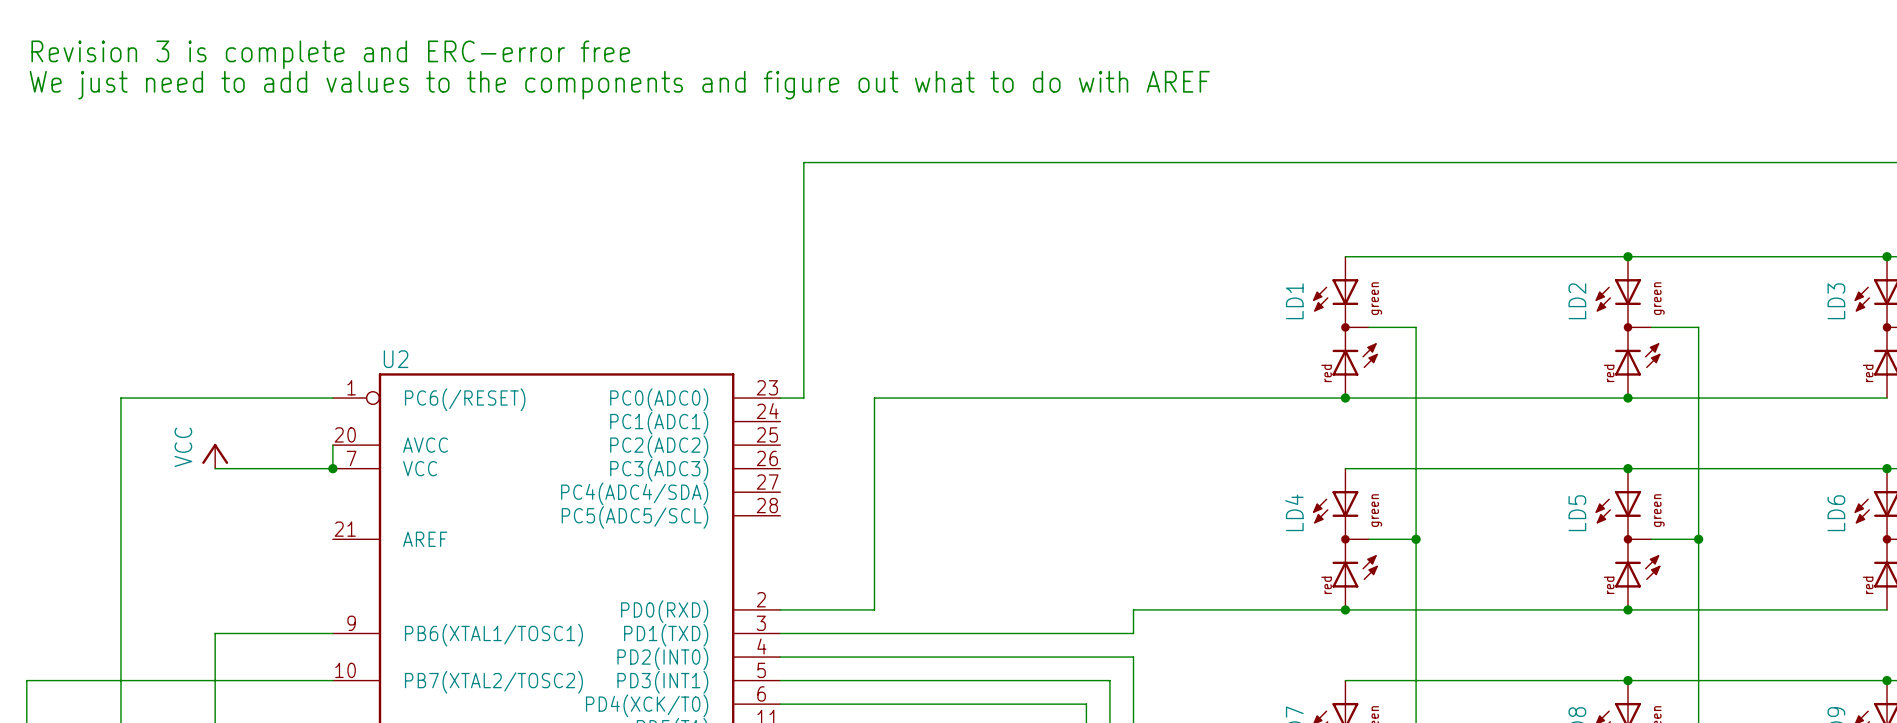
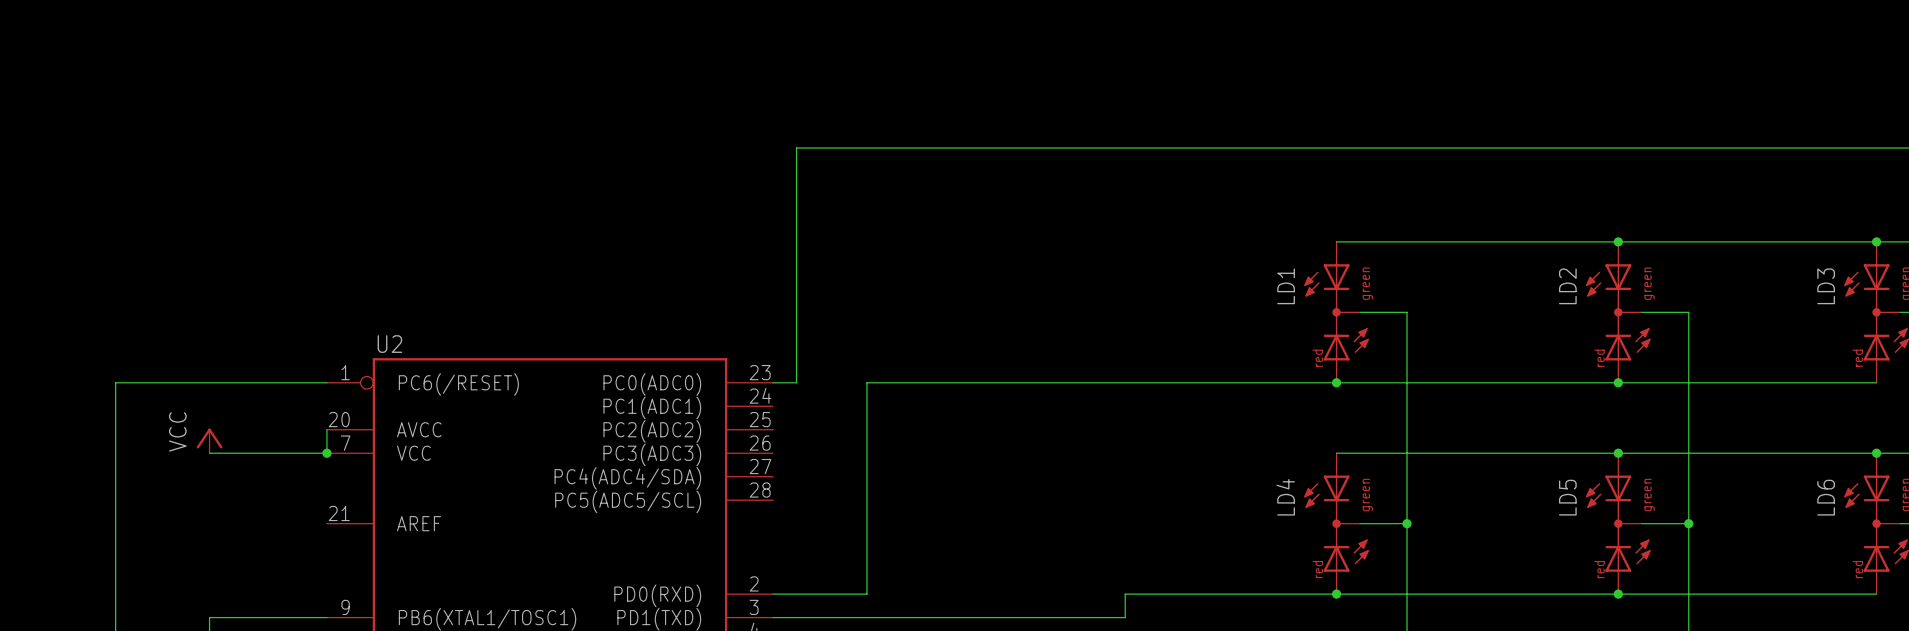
text: Revision 3 is complete and ERC-error free (330, 54) -> none
text: We just need to add values to the components and figure out what to do with AREF (619, 85) -> none

